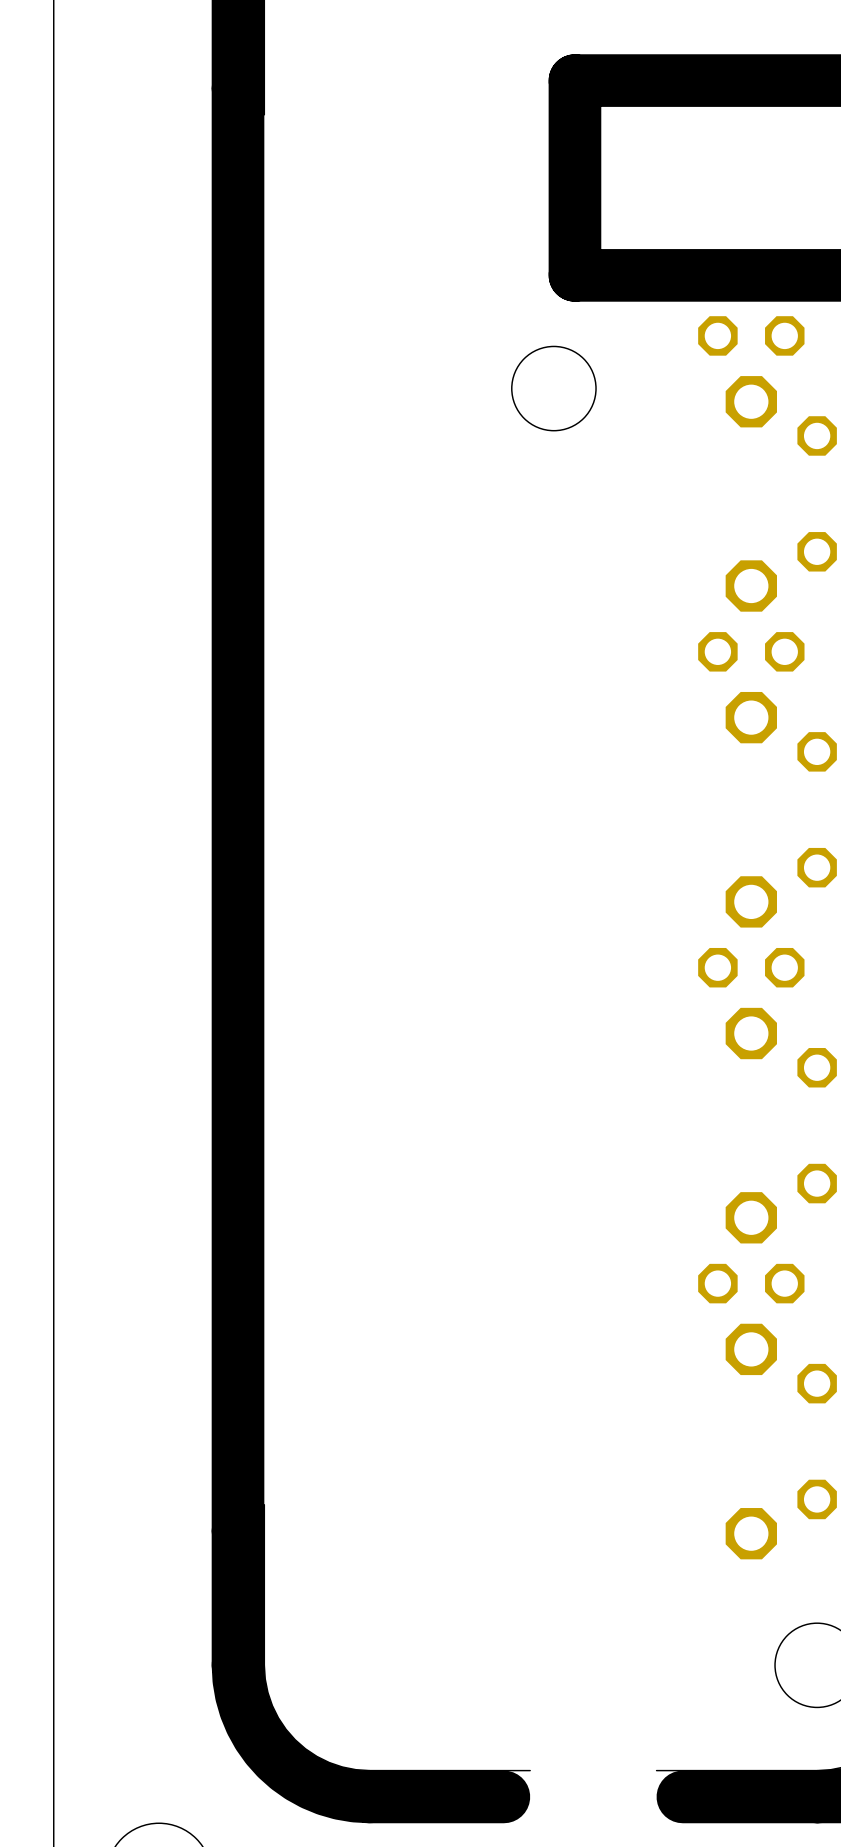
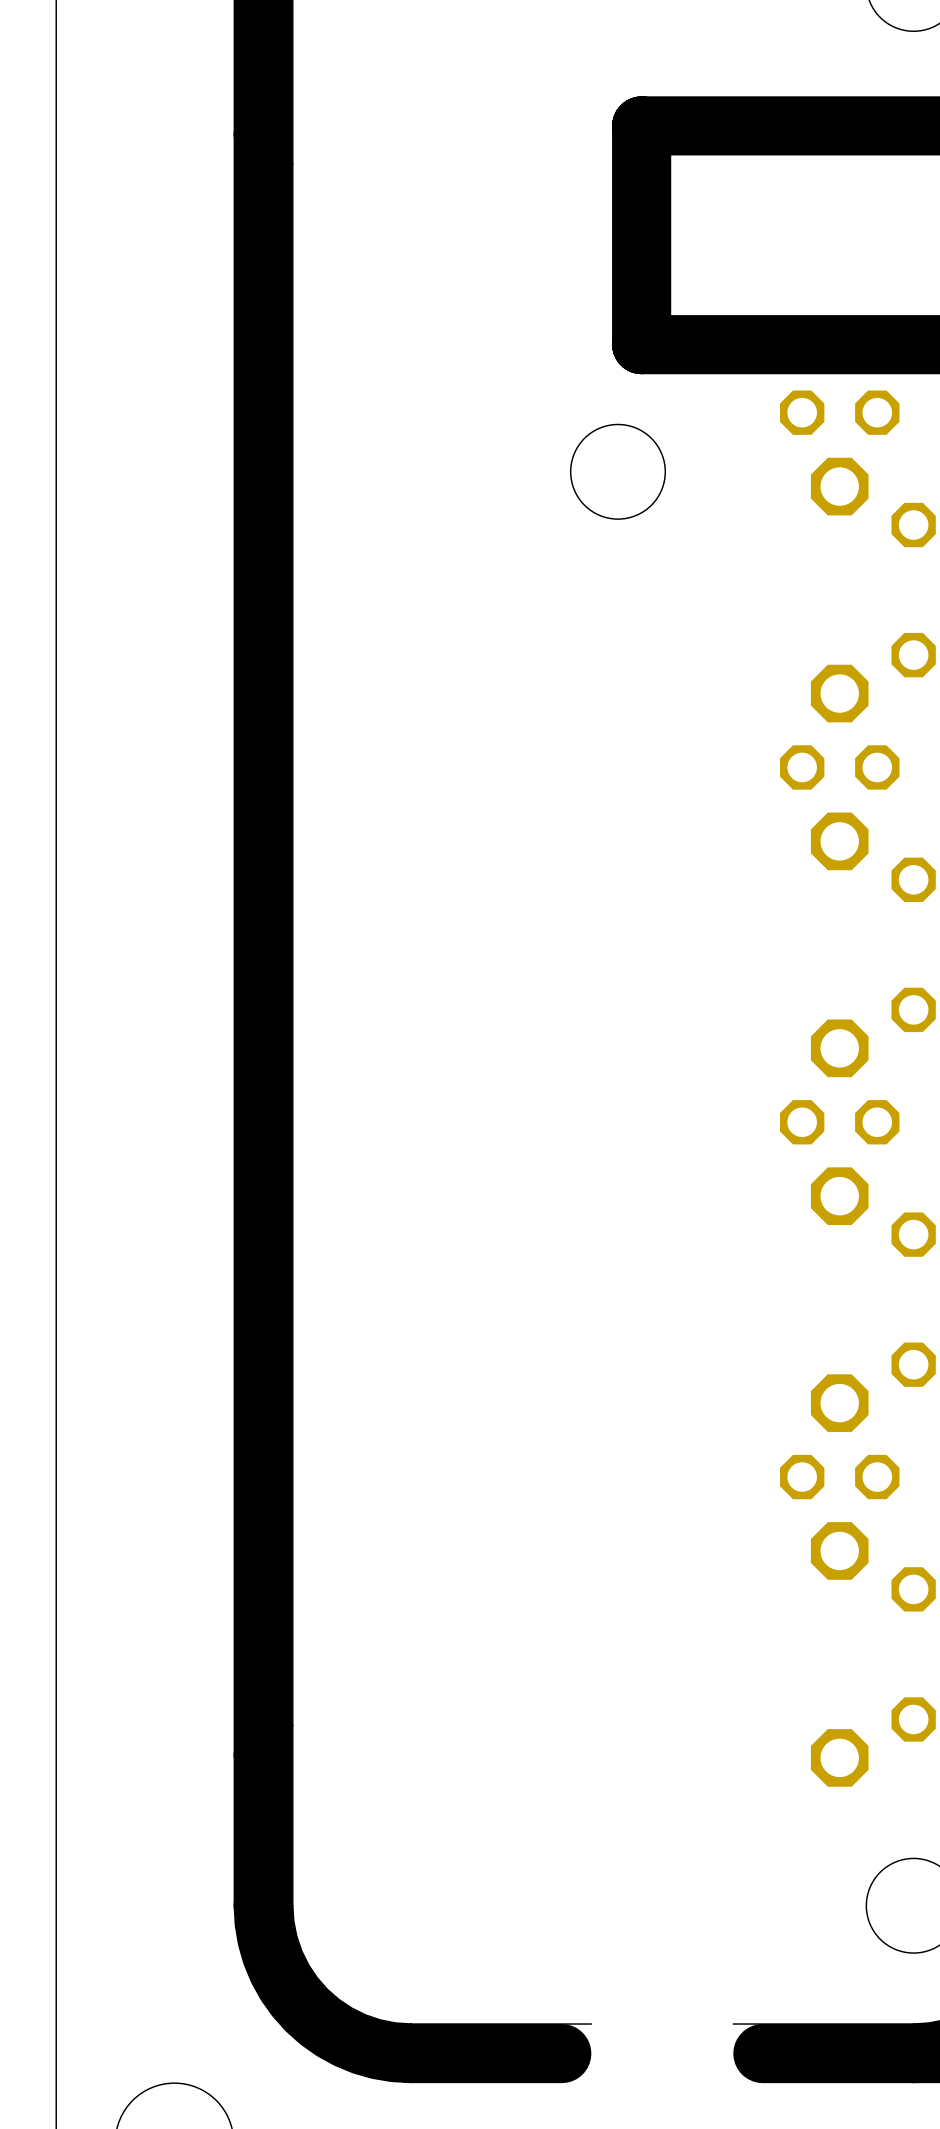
board edge: none -> (292, 164) (292, 1725)

